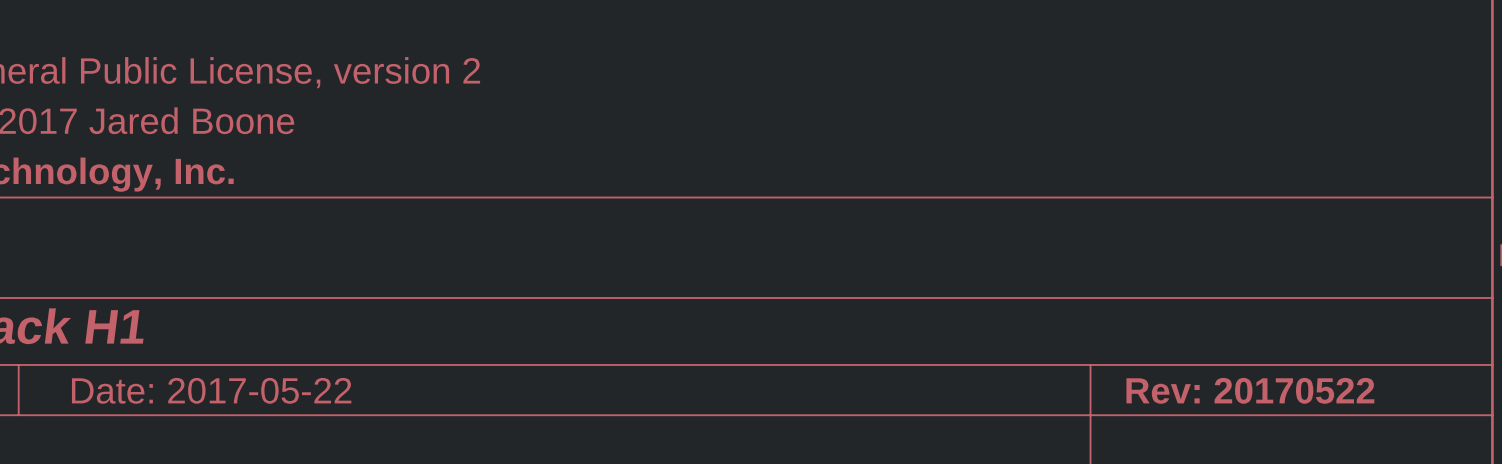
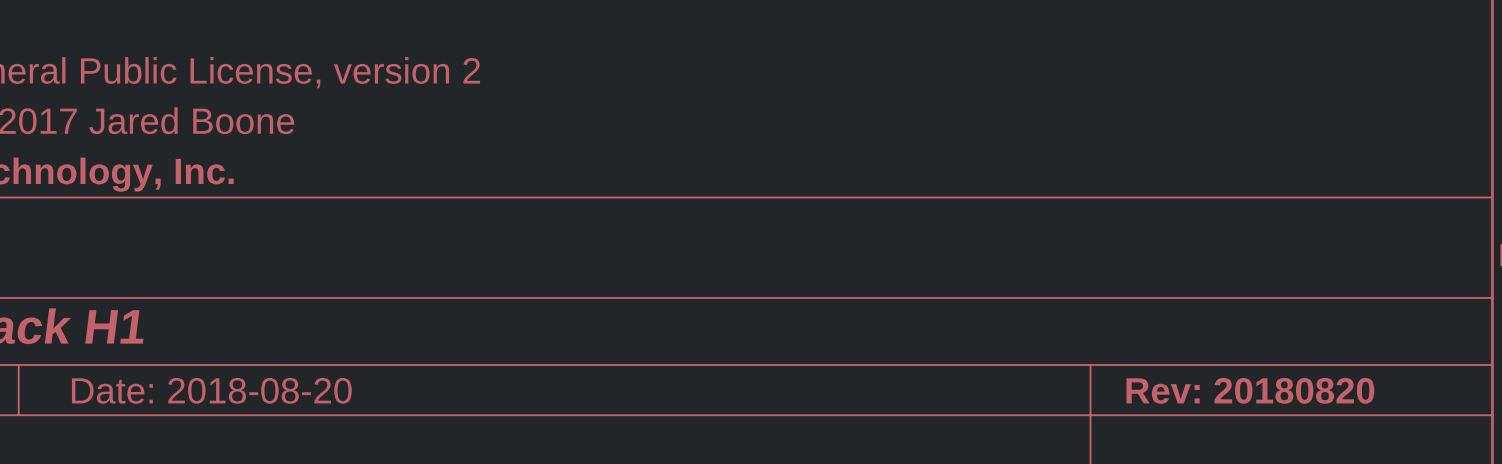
title block: Date: 2017-05-22 (211, 390) -> Date: 2018-08-20 (211, 390)
title block: Rev: 20170522 (1250, 390) -> Rev: 20180820 (1250, 390)

